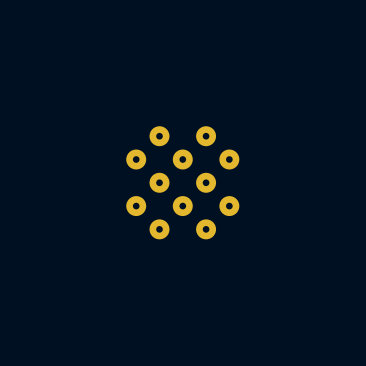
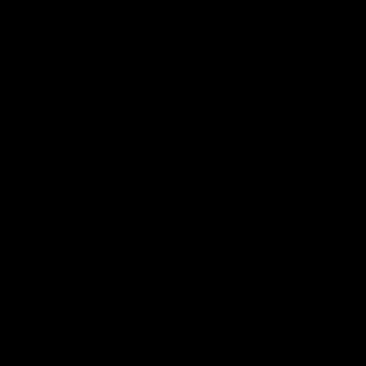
part: (182, 182) -> none

